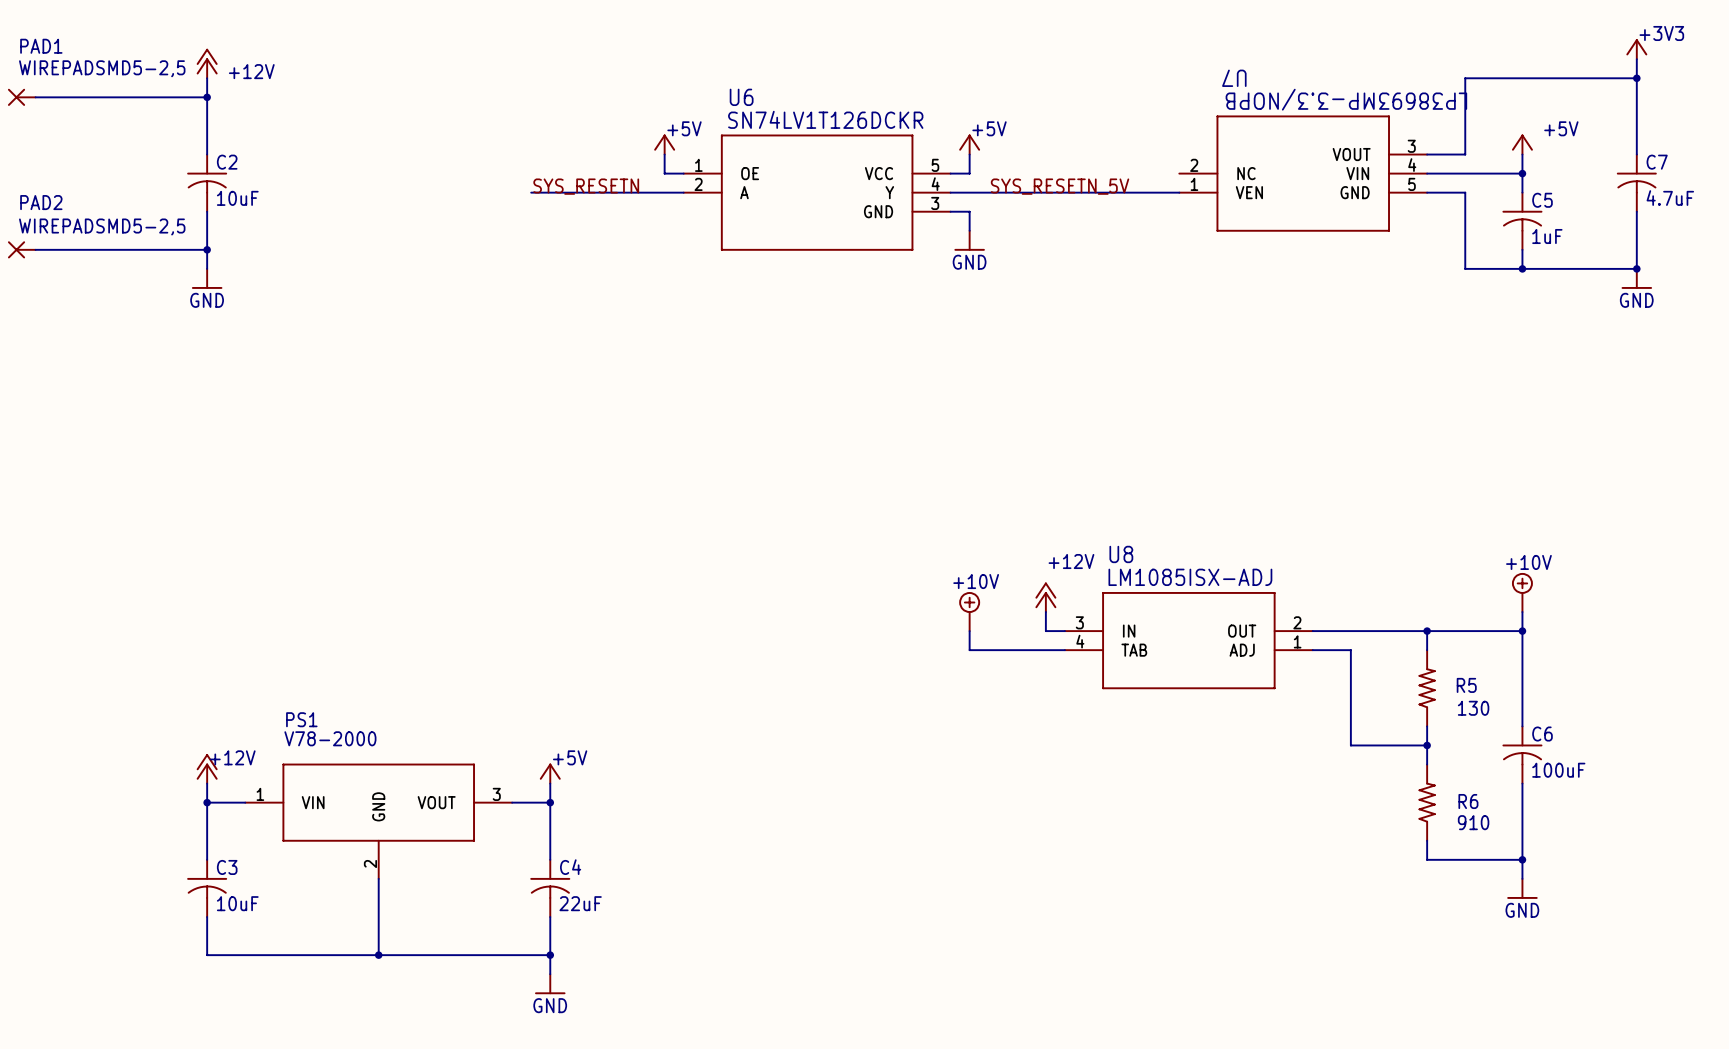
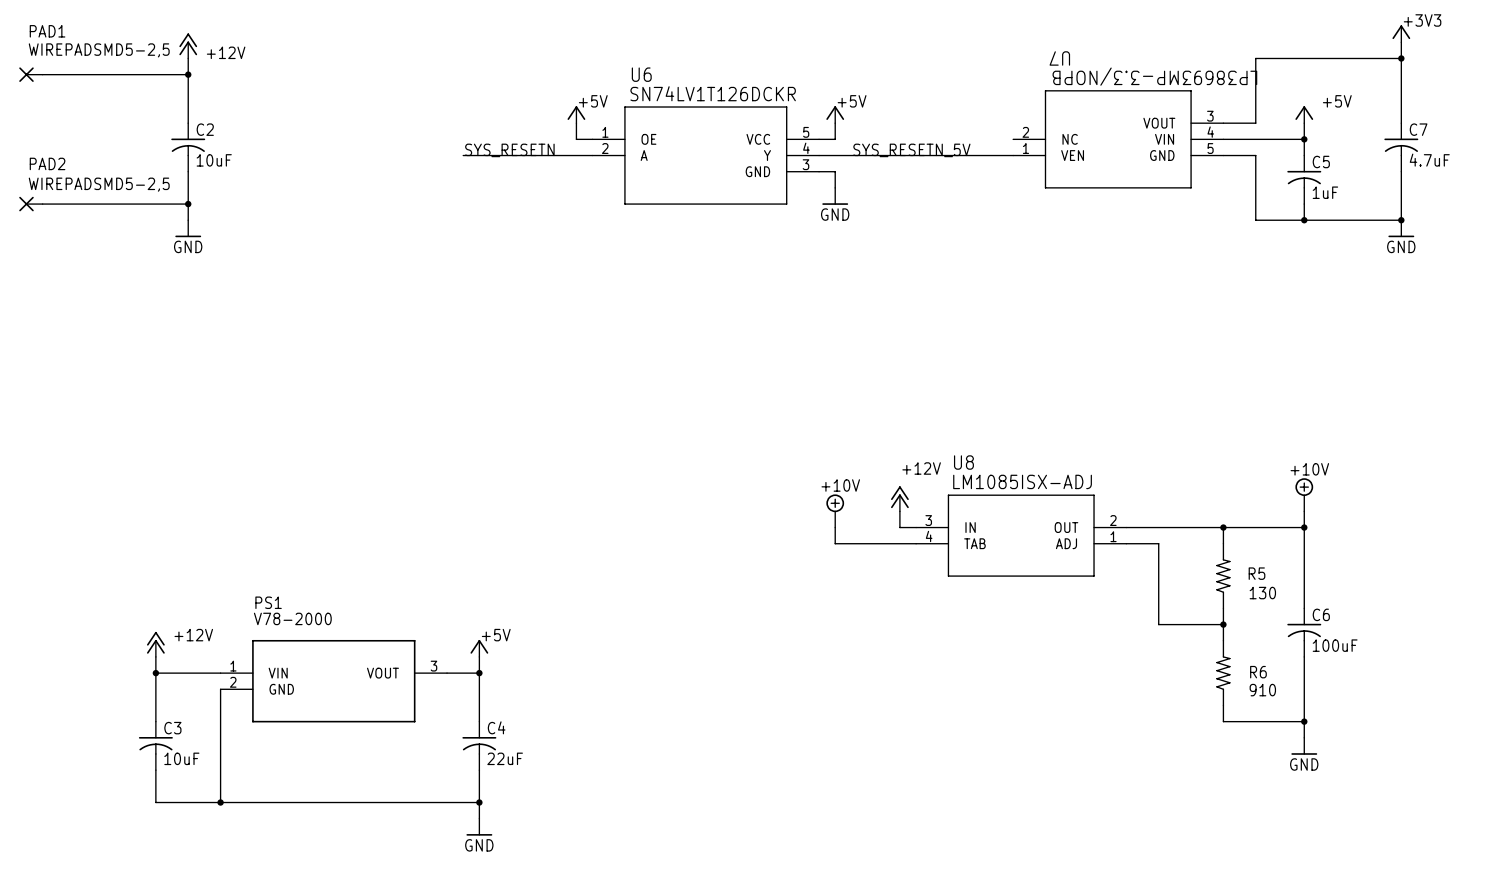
power symbol text position: +12V (232, 757) -> +12V (193, 635)
PS1 symbol: [245, 763, 513, 879] -> [220, 639, 448, 723]
power symbol position: +12V (207, 768) -> +12V (155, 644)
wire: (207, 783) (207, 859) -> (155, 656) (155, 721)
wire: none -> (155, 673) (188, 673)
junction position: (207, 802) -> (155, 673)
wire: none -> (220, 689) (220, 802)
wire: (378, 878) (378, 955) -> none
C3 position: (207, 888) -> (155, 745)
wire: (207, 917) (207, 955) -> (155, 770) (155, 802) (188, 802)
junction: none -> (220, 802)
junction: (378, 955) -> none

